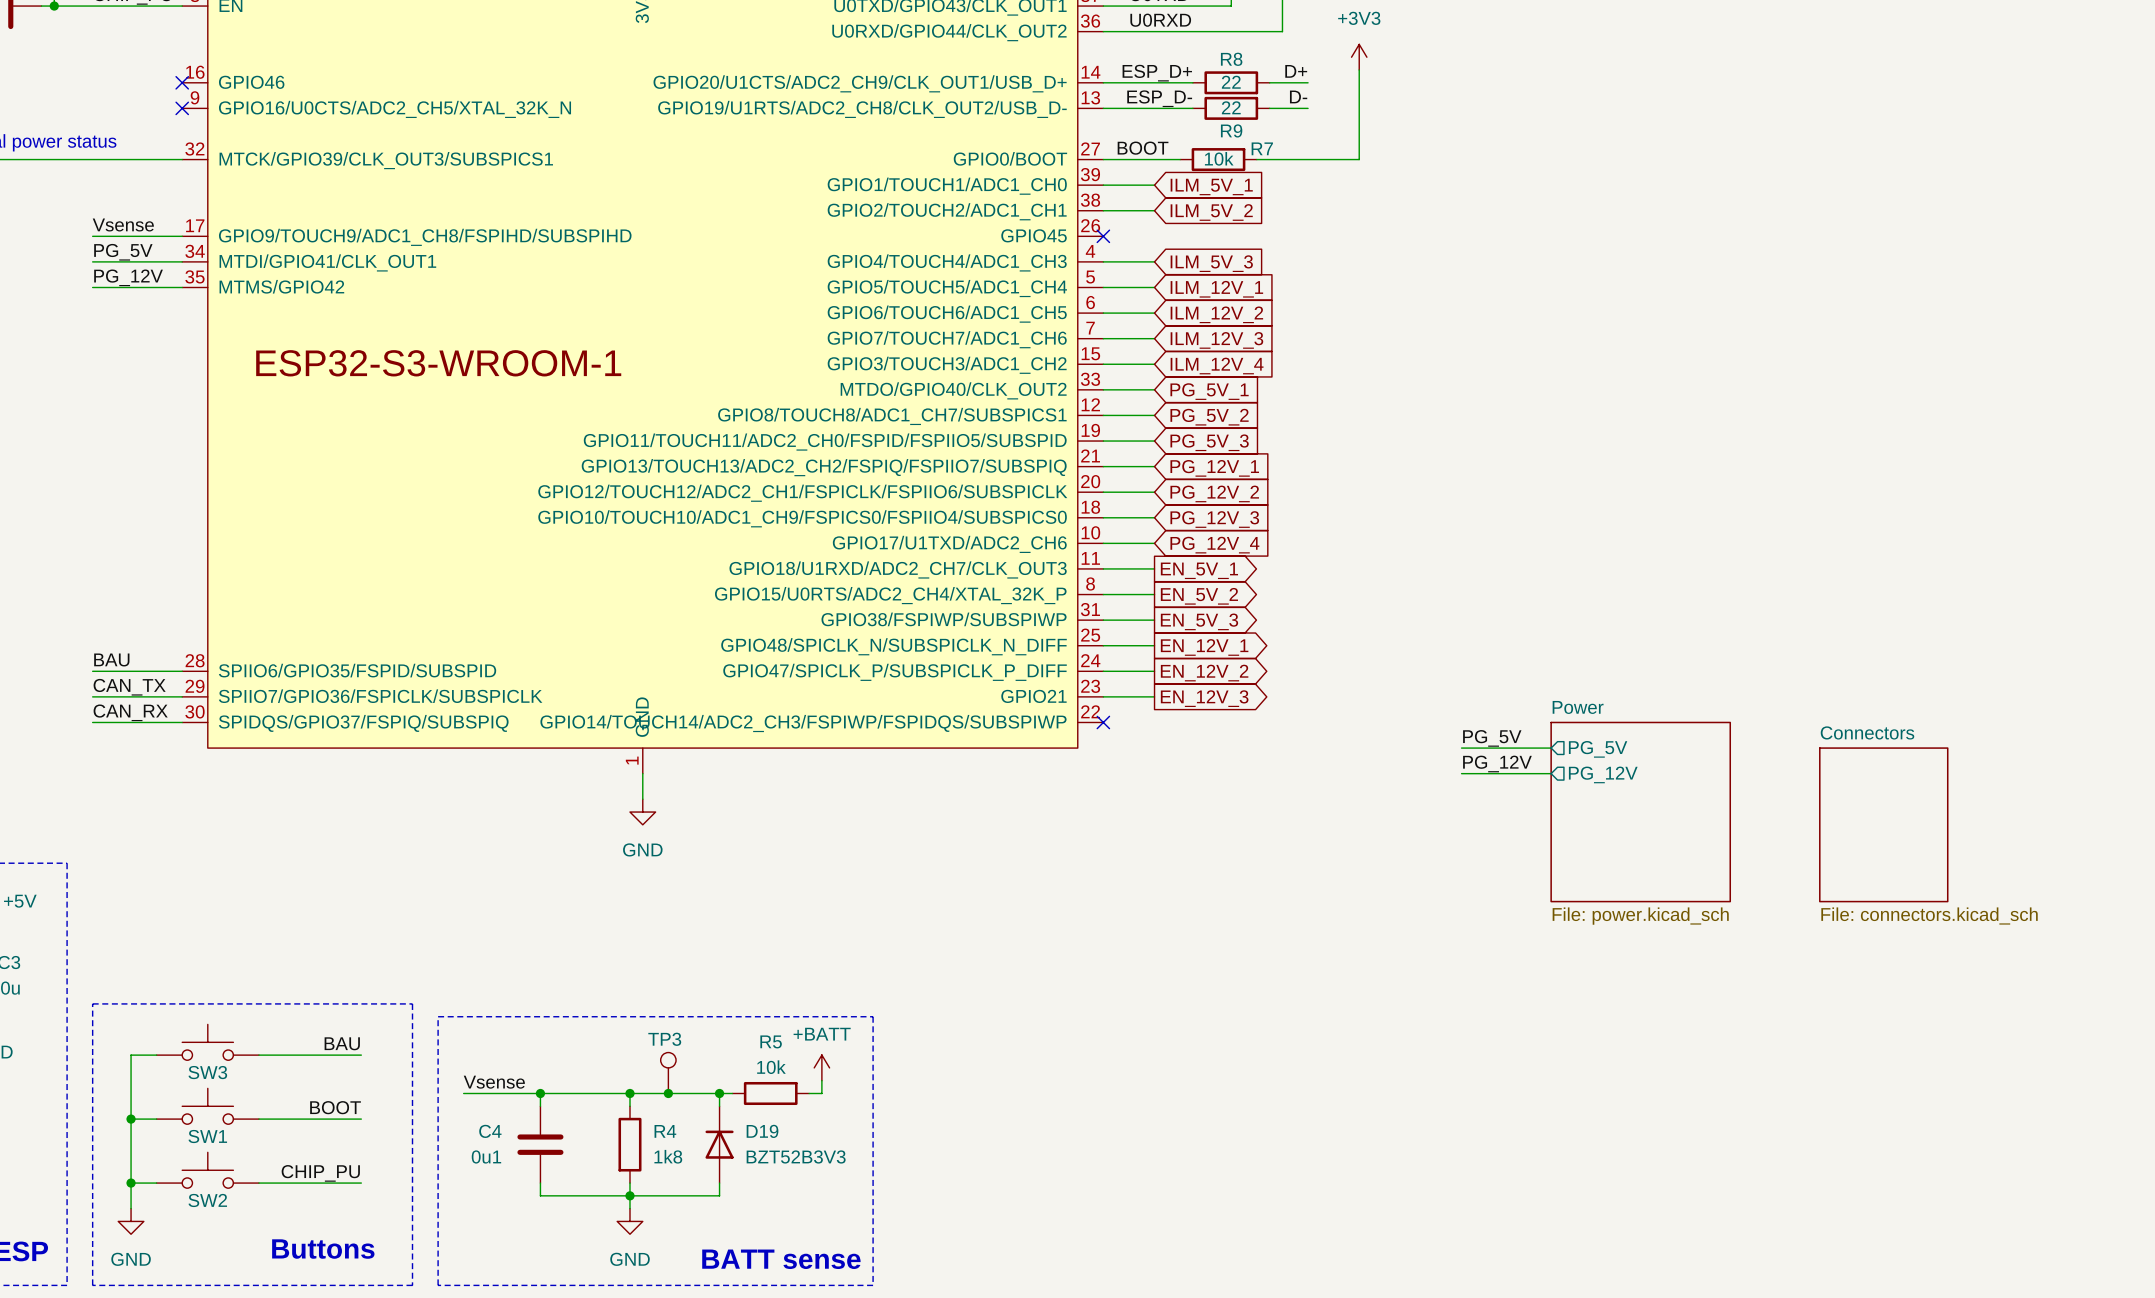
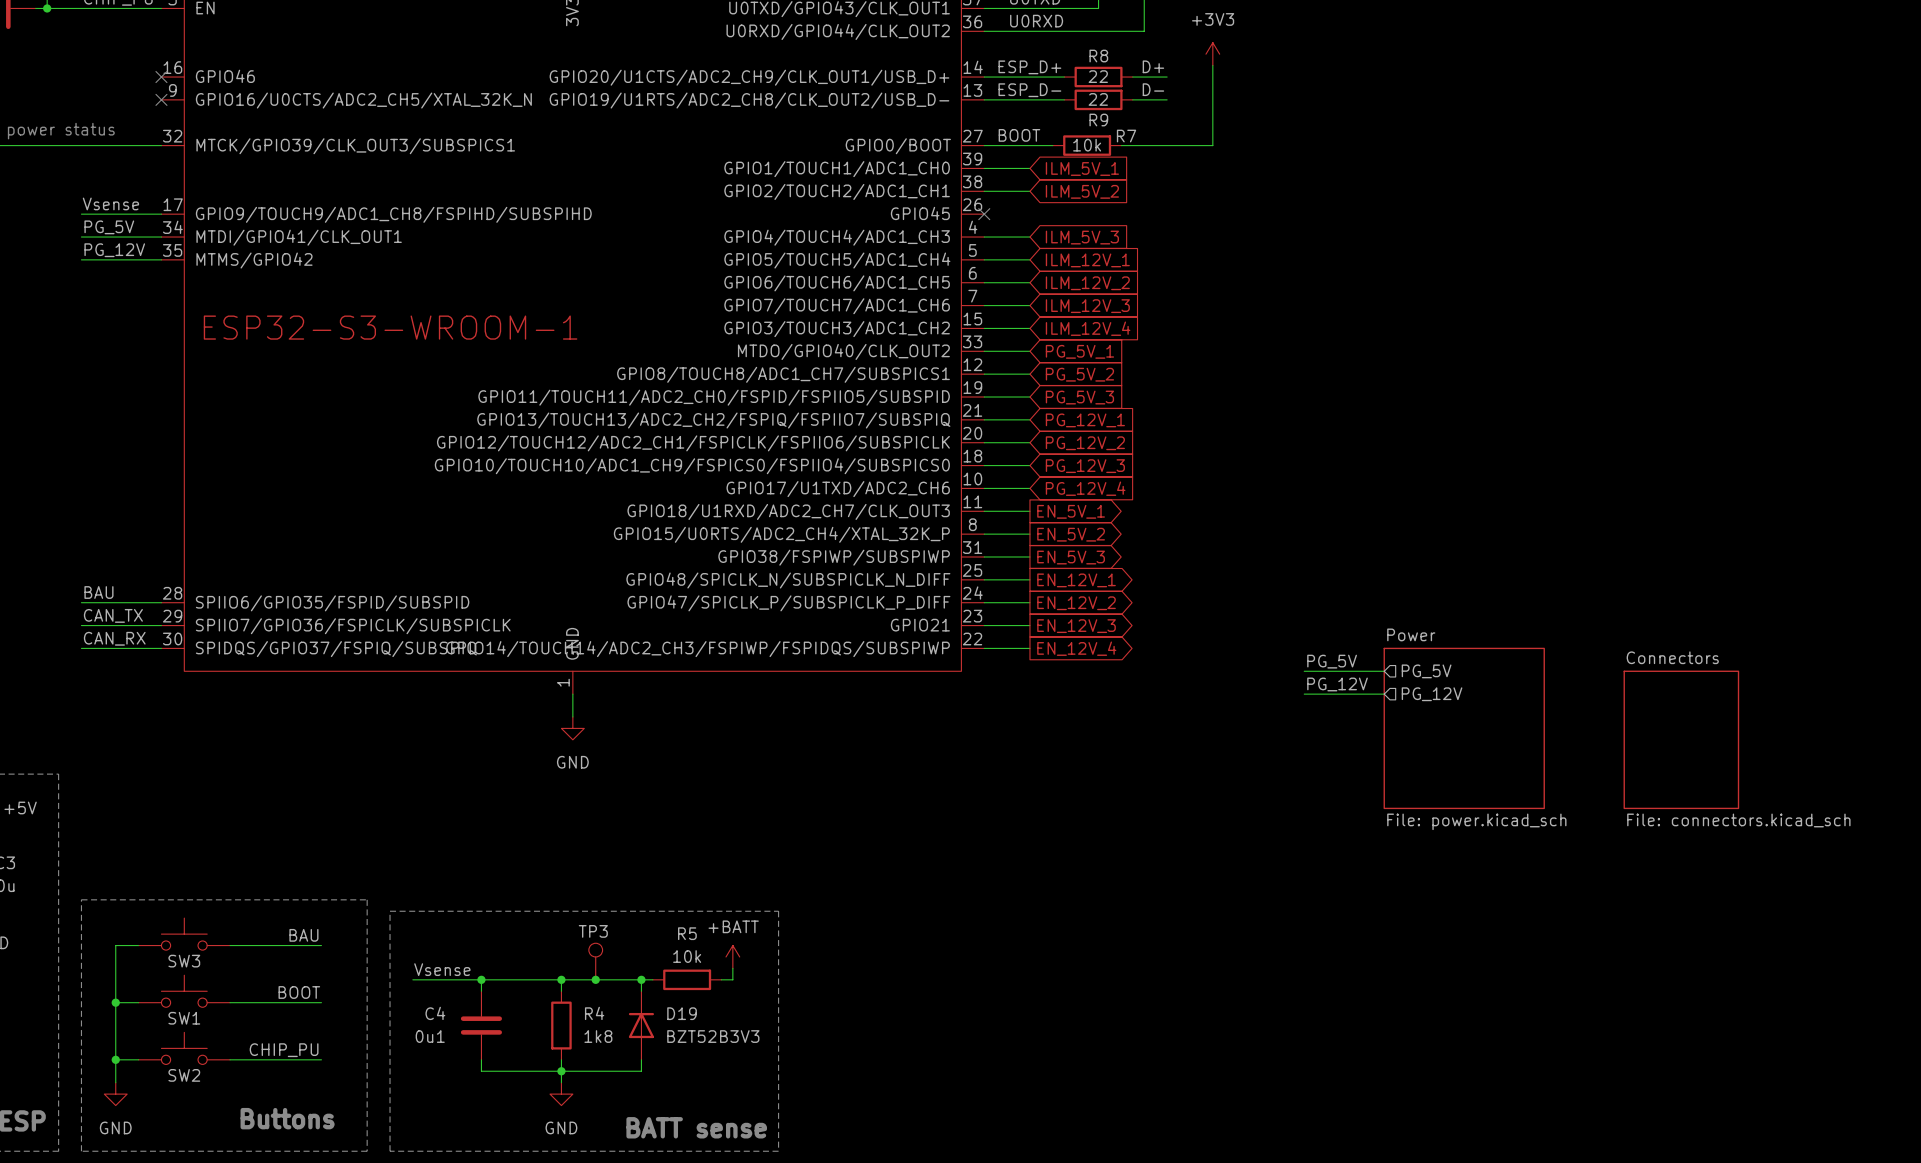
wire: none -> (984, 648) (1029, 648)
no-connect mark: (1103, 722) -> none
global label: none -> EN_12V_4 (1076, 648)

